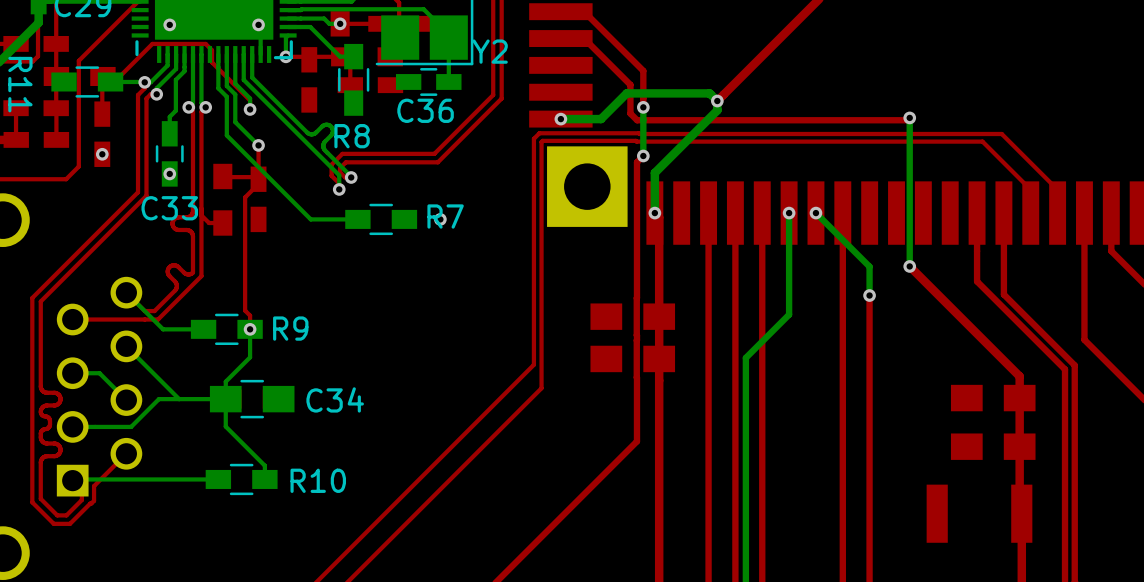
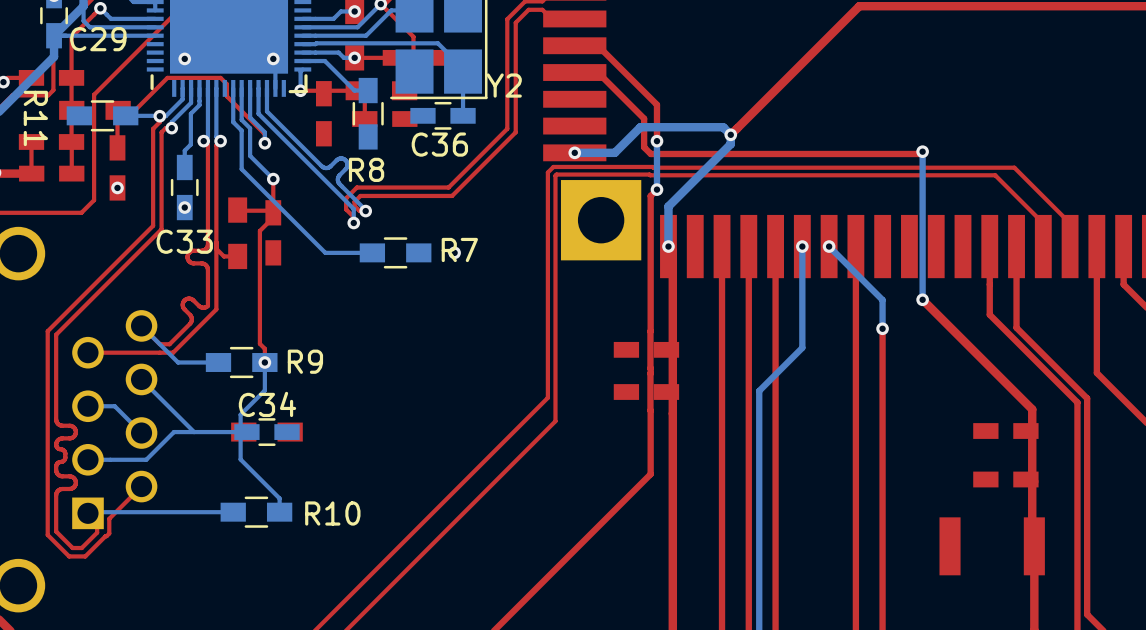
part footprint: [590, 303, 676, 330] -> [613, 341, 680, 358]
part footprint: [590, 345, 676, 373] -> [613, 384, 680, 400]
C34 footprint: [209, 379, 295, 419] -> [234, 418, 300, 446]
part footprint: [950, 384, 1036, 412] -> [973, 423, 1039, 439]
C34 name position: C34 (335, 399) -> C34 (267, 404)
part footprint: [950, 433, 1036, 460] -> [973, 471, 1039, 488]

